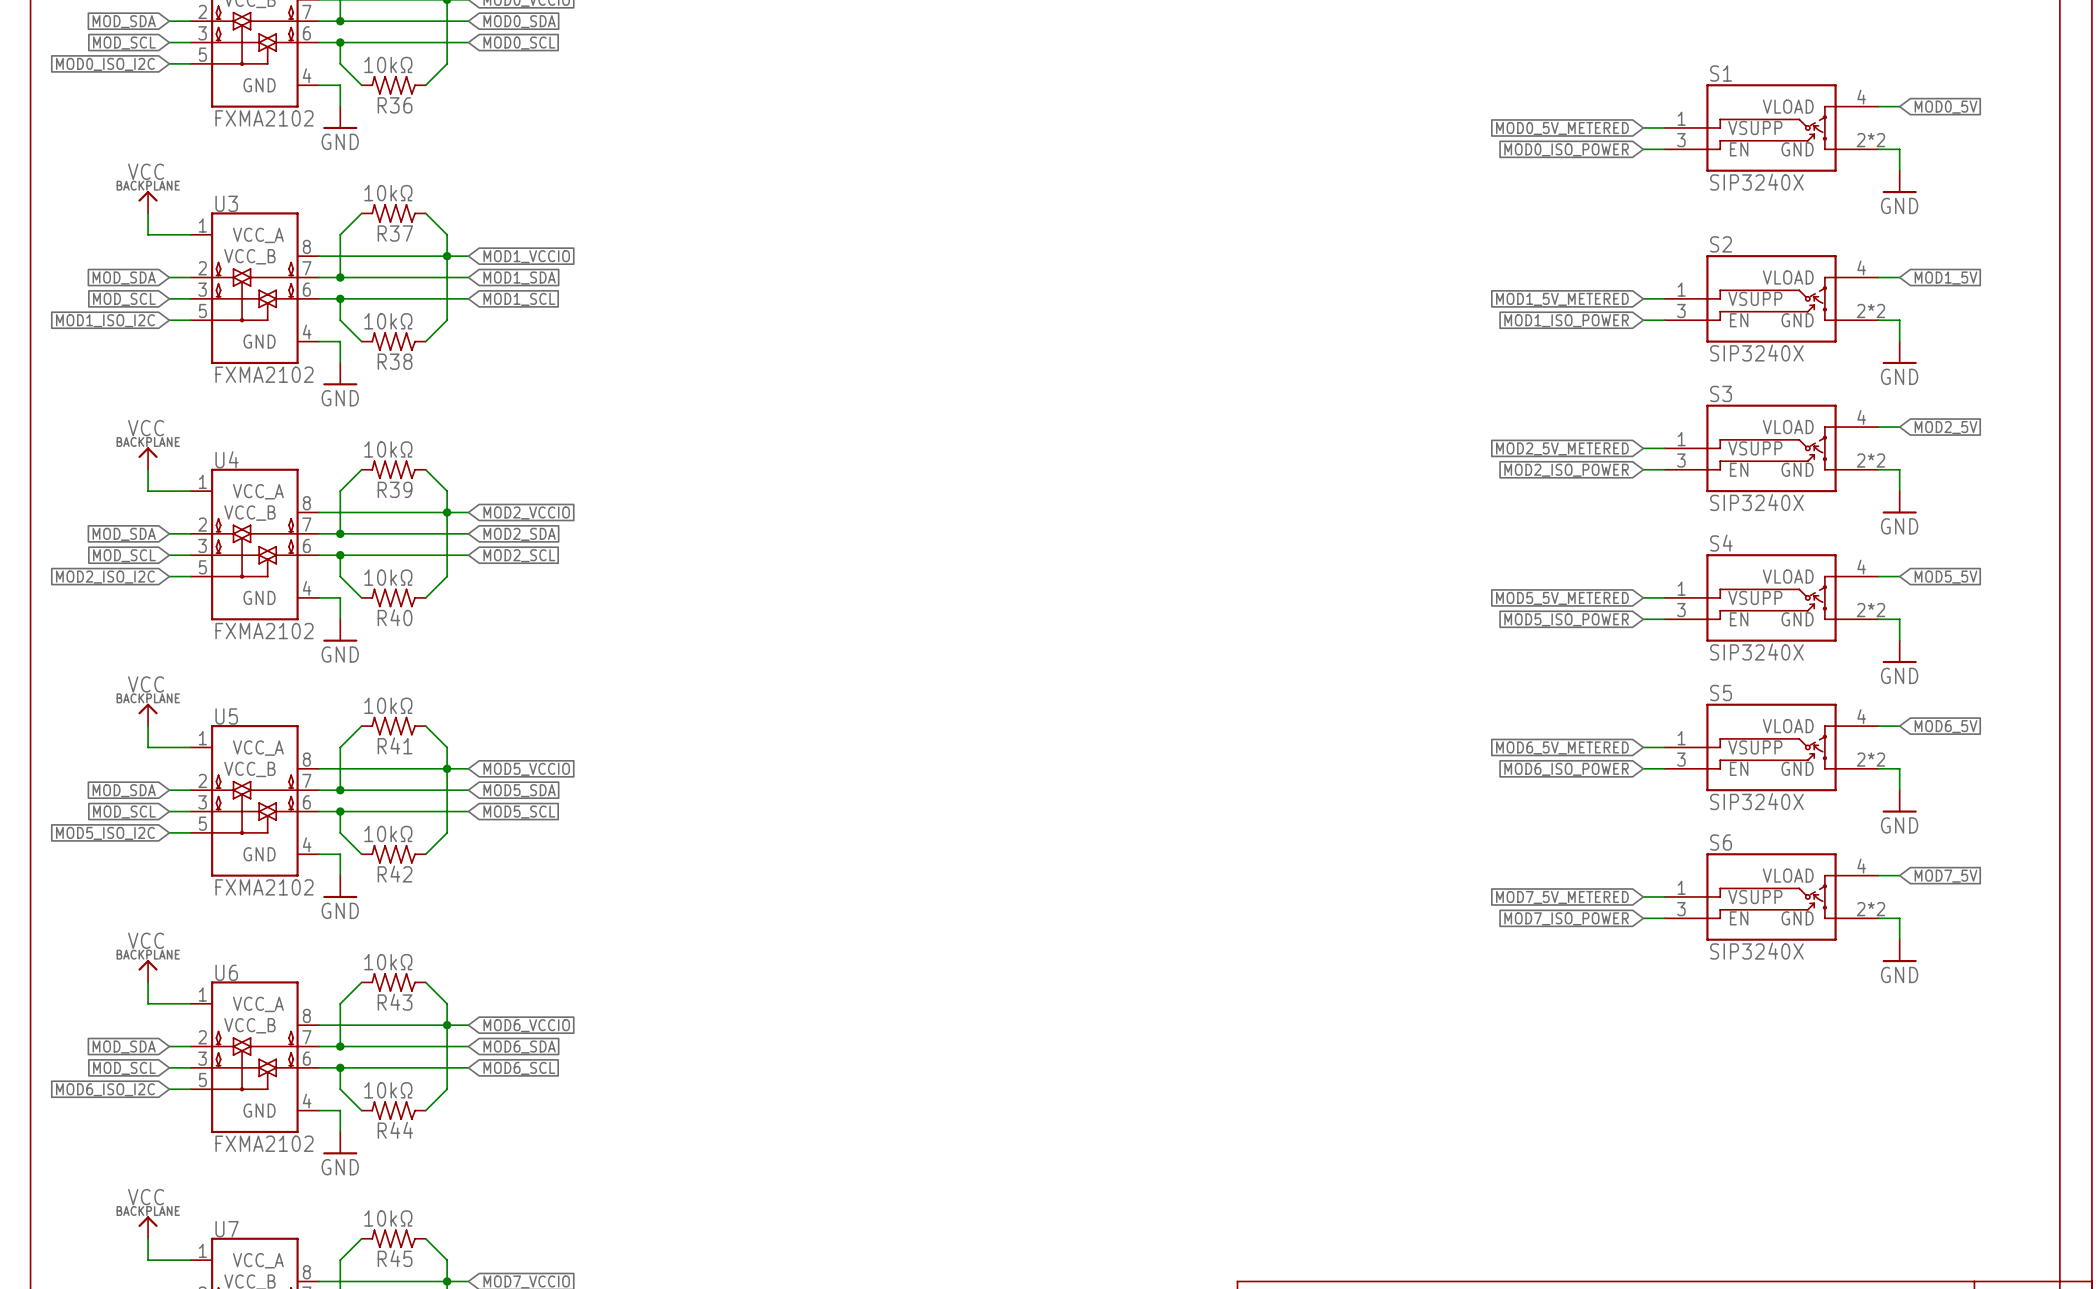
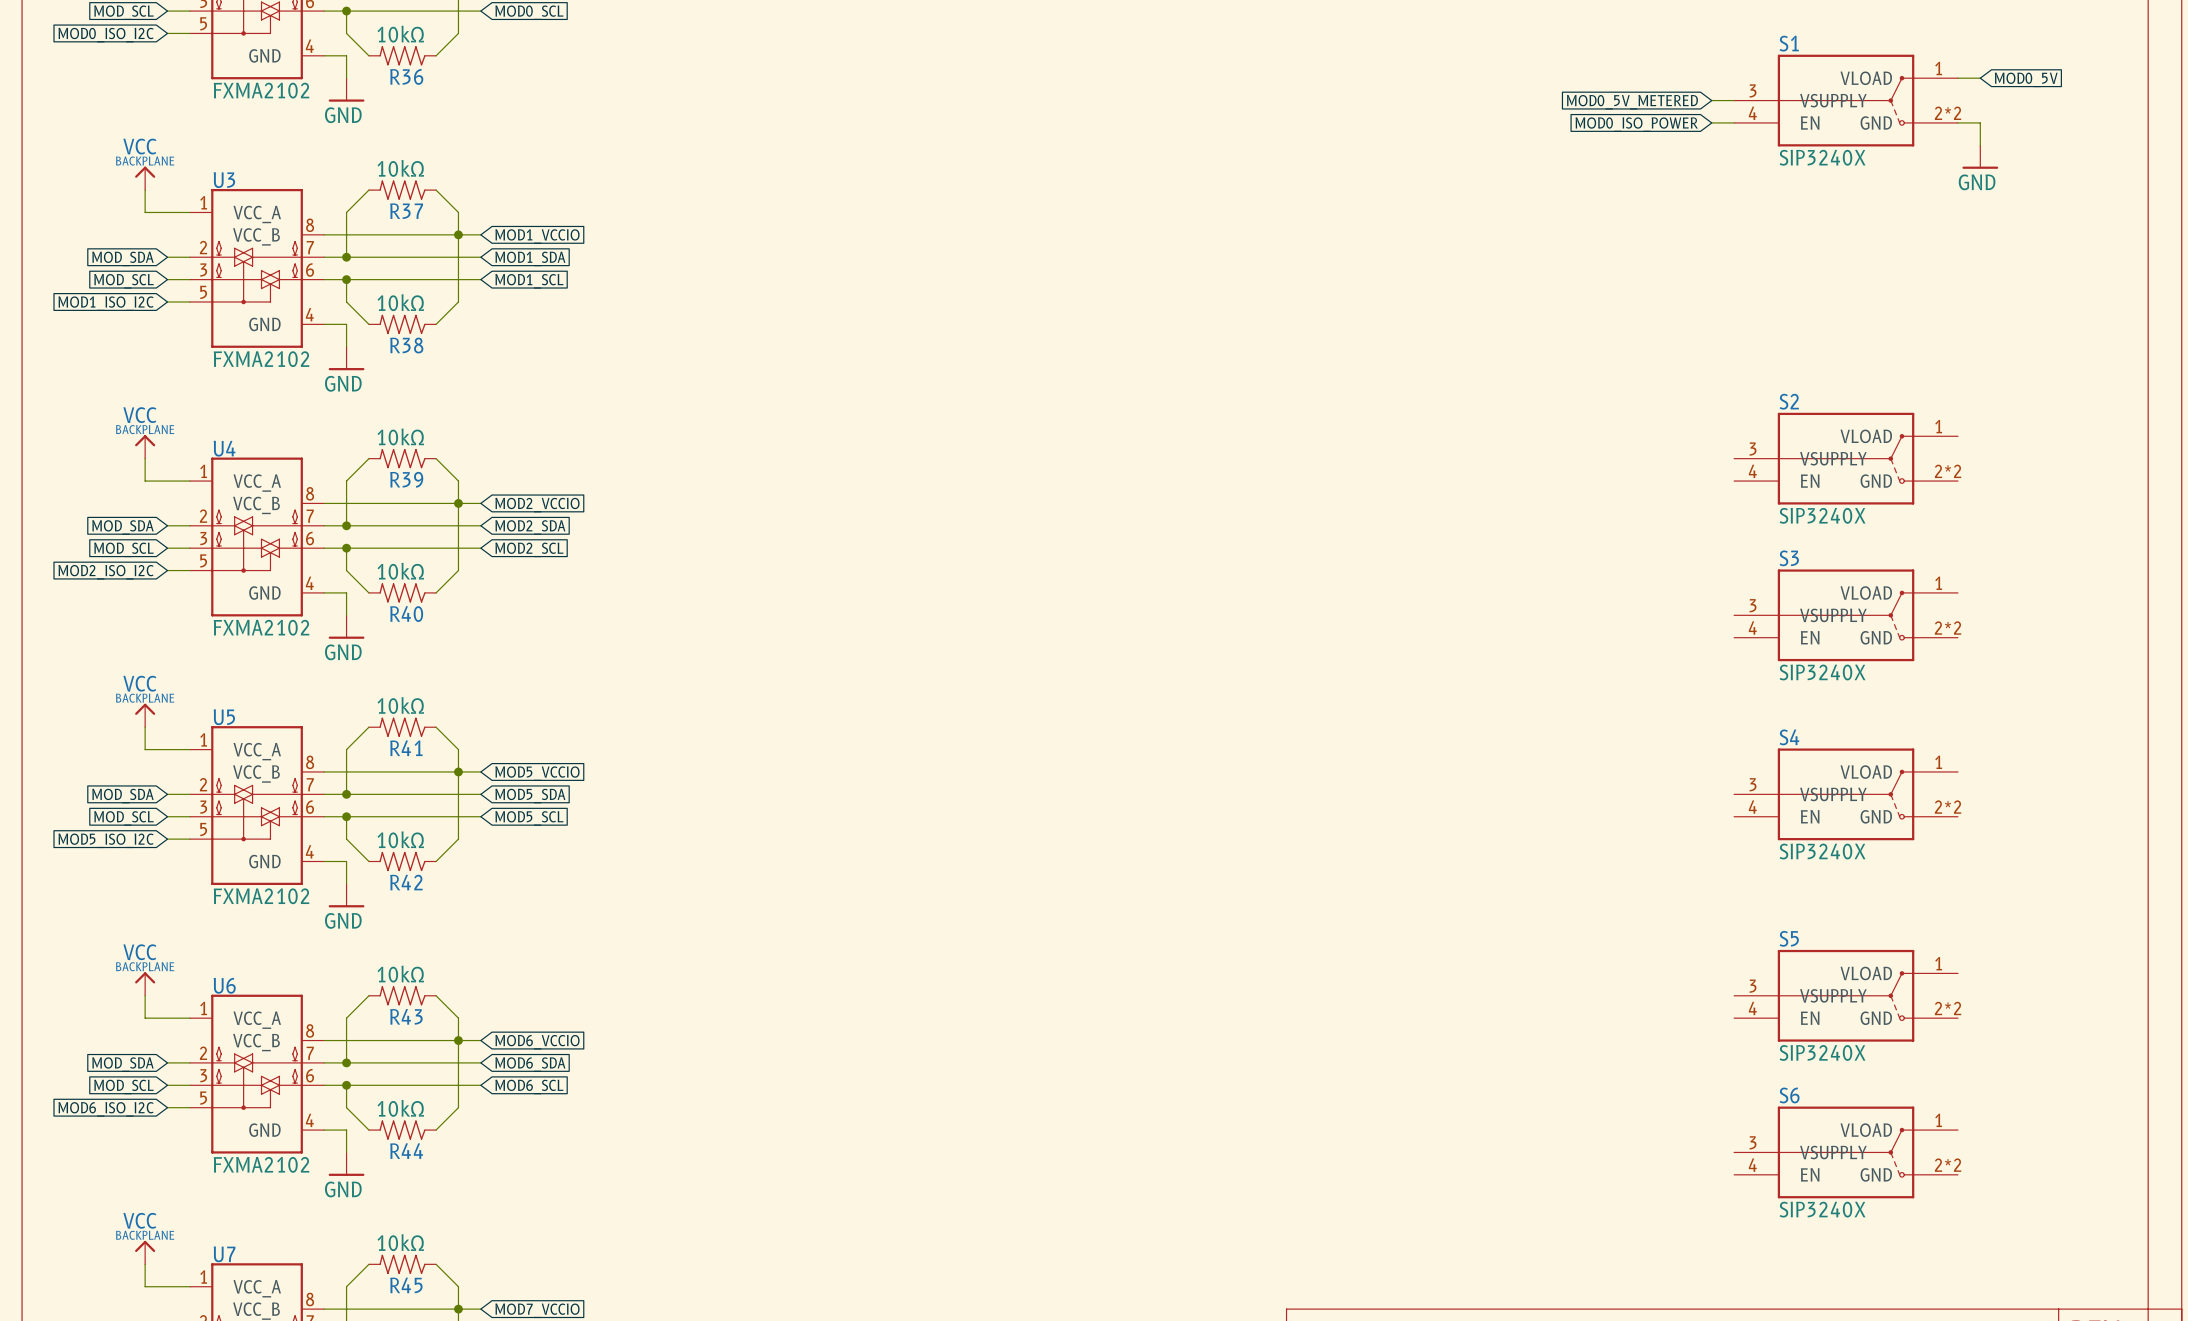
S1 symbol: [1664, 84, 1879, 172] -> [1734, 54, 1958, 147]
S2 symbol: [1664, 255, 1879, 343] -> [1734, 412, 1958, 505]
wire: (1878, 277) (1899, 277) -> none
global label: MOD1_5V (1946, 278) -> none
wire: (1643, 298) (1664, 298) -> none
global label: MOD1_5V_METERED (1562, 299) -> none
global label: MOD1_ISO_POWER (1566, 320) -> none
wire: (1643, 320) (1664, 320) -> none
wire: (1878, 320) (1899, 320) (1899, 341) -> none
power symbol: GND (1899, 352) -> none
S3 symbol: [1664, 404, 1879, 493] -> [1734, 569, 1958, 662]
wire: (1878, 427) (1899, 427) -> none
global label: MOD2_5V (1946, 427) -> none
global label: MOD2_5V_METERED (1562, 448) -> none
wire: (1643, 448) (1664, 448) -> none
wire: (1643, 469) (1664, 469) -> none
wire: (1878, 469) (1899, 469) (1899, 491) -> none
global label: MOD2_ISO_POWER (1566, 470) -> none
power symbol: GND (1899, 502) -> none
S4 symbol: [1664, 554, 1879, 642] -> [1734, 748, 1958, 841]
wire: (1878, 576) (1899, 576) -> none
global label: MOD5_5V (1946, 577) -> none
wire: (1643, 597) (1664, 597) -> none
global label: MOD5_5V_METERED (1562, 598) -> none
global label: MOD5_ISO_POWER (1566, 619) -> none
wire: (1643, 619) (1664, 619) -> none
wire: (1878, 619) (1899, 619) (1899, 640) -> none
power symbol: GND (1899, 651) -> none
S5 symbol: [1664, 703, 1879, 792] -> [1734, 949, 1958, 1042]
wire: (1878, 726) (1899, 726) -> none
global label: MOD6_5V (1946, 726) -> none
global label: MOD6_5V_METERED (1562, 747) -> none
wire: (1643, 747) (1664, 747) -> none
wire: (1643, 768) (1664, 768) -> none
wire: (1878, 768) (1899, 768) (1899, 790) -> none
global label: MOD6_ISO_POWER (1566, 769) -> none
power symbol: GND (1899, 801) -> none
S6 symbol: [1664, 853, 1879, 941] -> [1734, 1106, 1958, 1199]
wire: (1878, 875) (1899, 875) -> none
global label: MOD7_5V (1946, 876) -> none
wire: (1643, 896) (1664, 896) -> none
global label: MOD7_5V_METERED (1562, 897) -> none
global label: MOD7_ISO_POWER (1566, 918) -> none
wire: (1643, 918) (1664, 918) -> none
wire: (1878, 918) (1899, 918) (1899, 939) -> none
power symbol: GND (1899, 950) -> none

